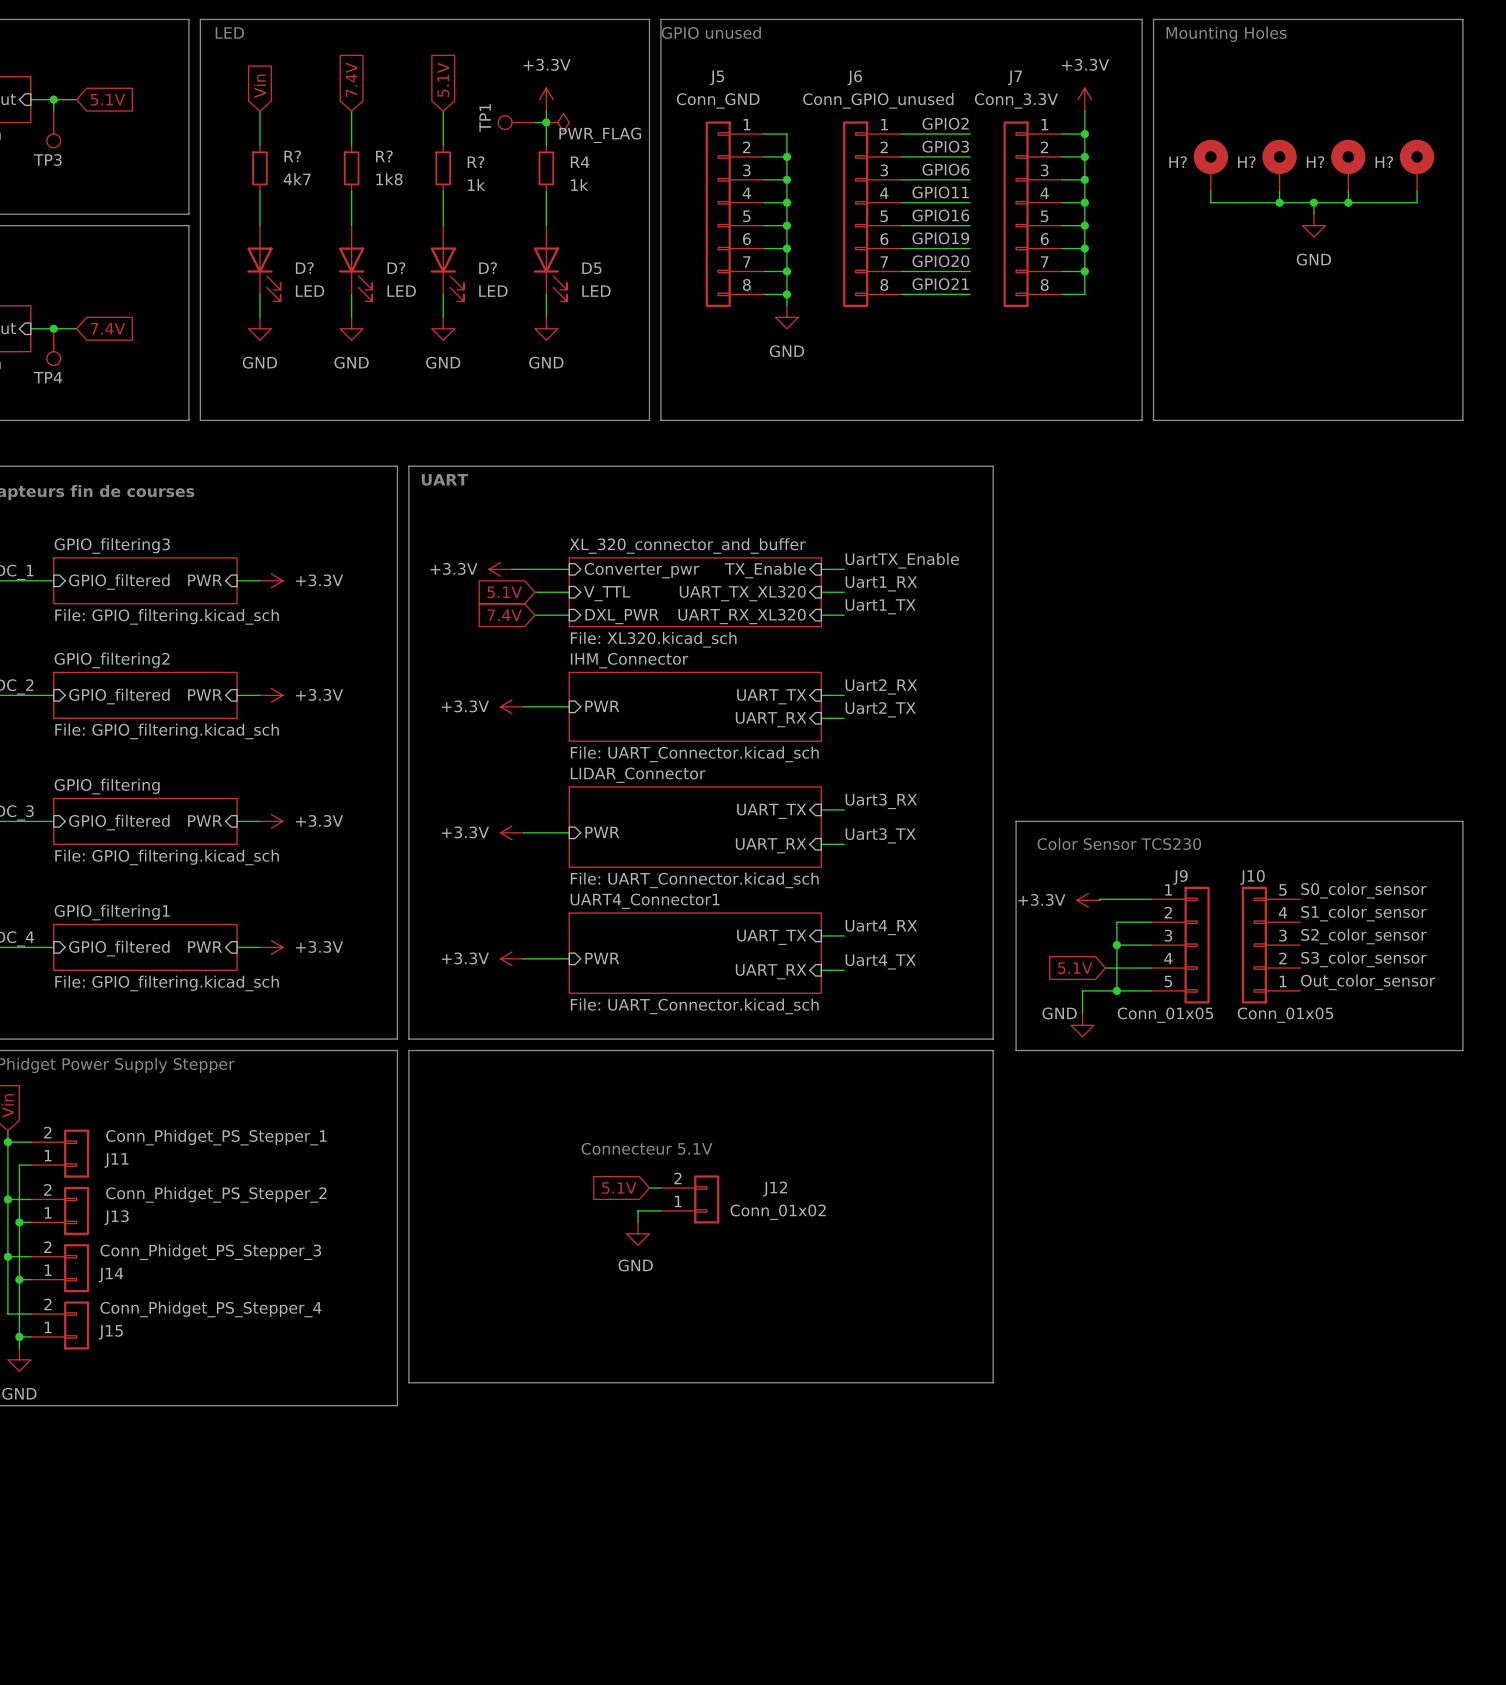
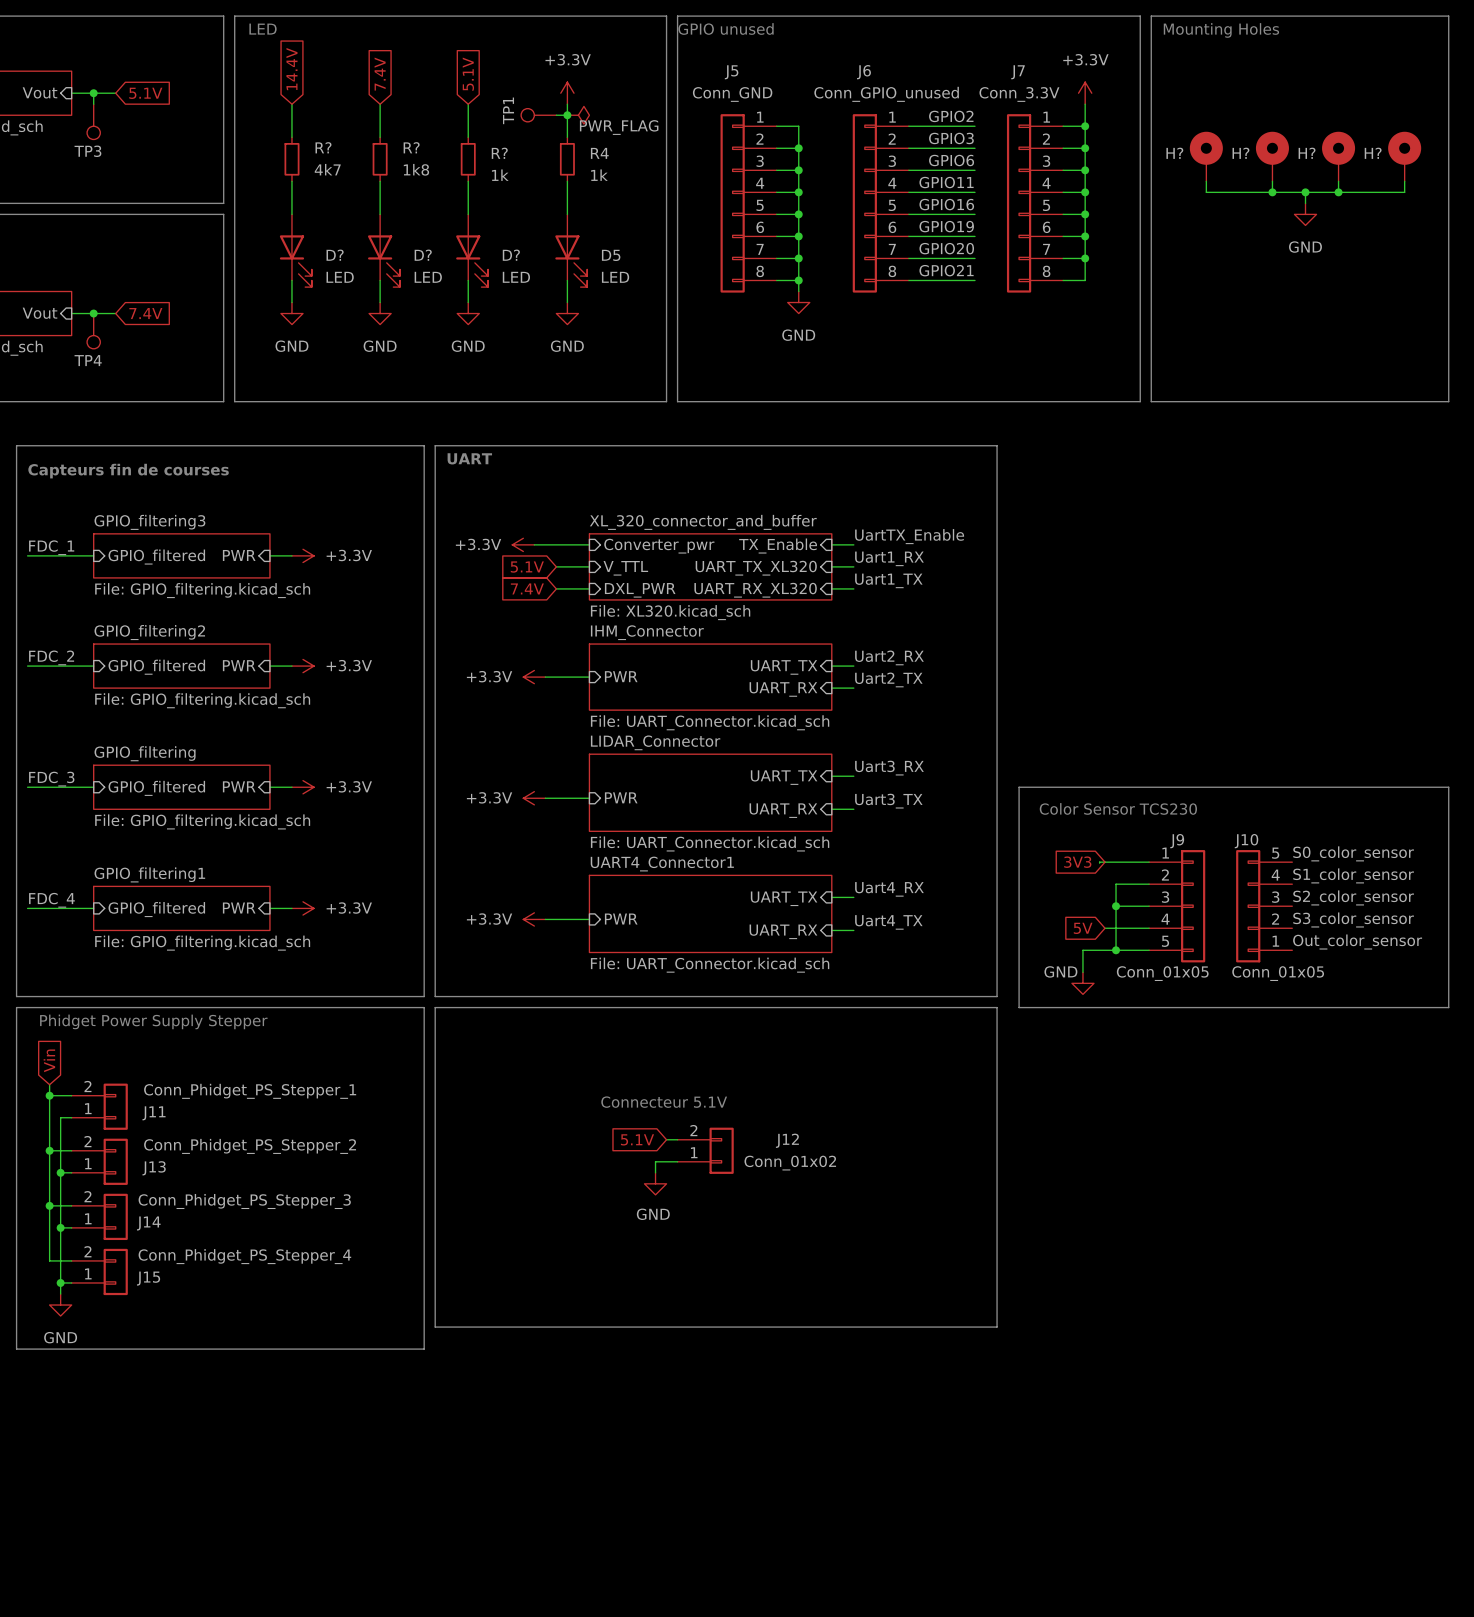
global label: Vin (259, 86) -> 14.4V (291, 69)
global label: none -> 3V3 (1077, 862)
power symbol: +3.3V (1088, 900) -> none
global label: 5.1V (1075, 968) -> 5V (1083, 928)

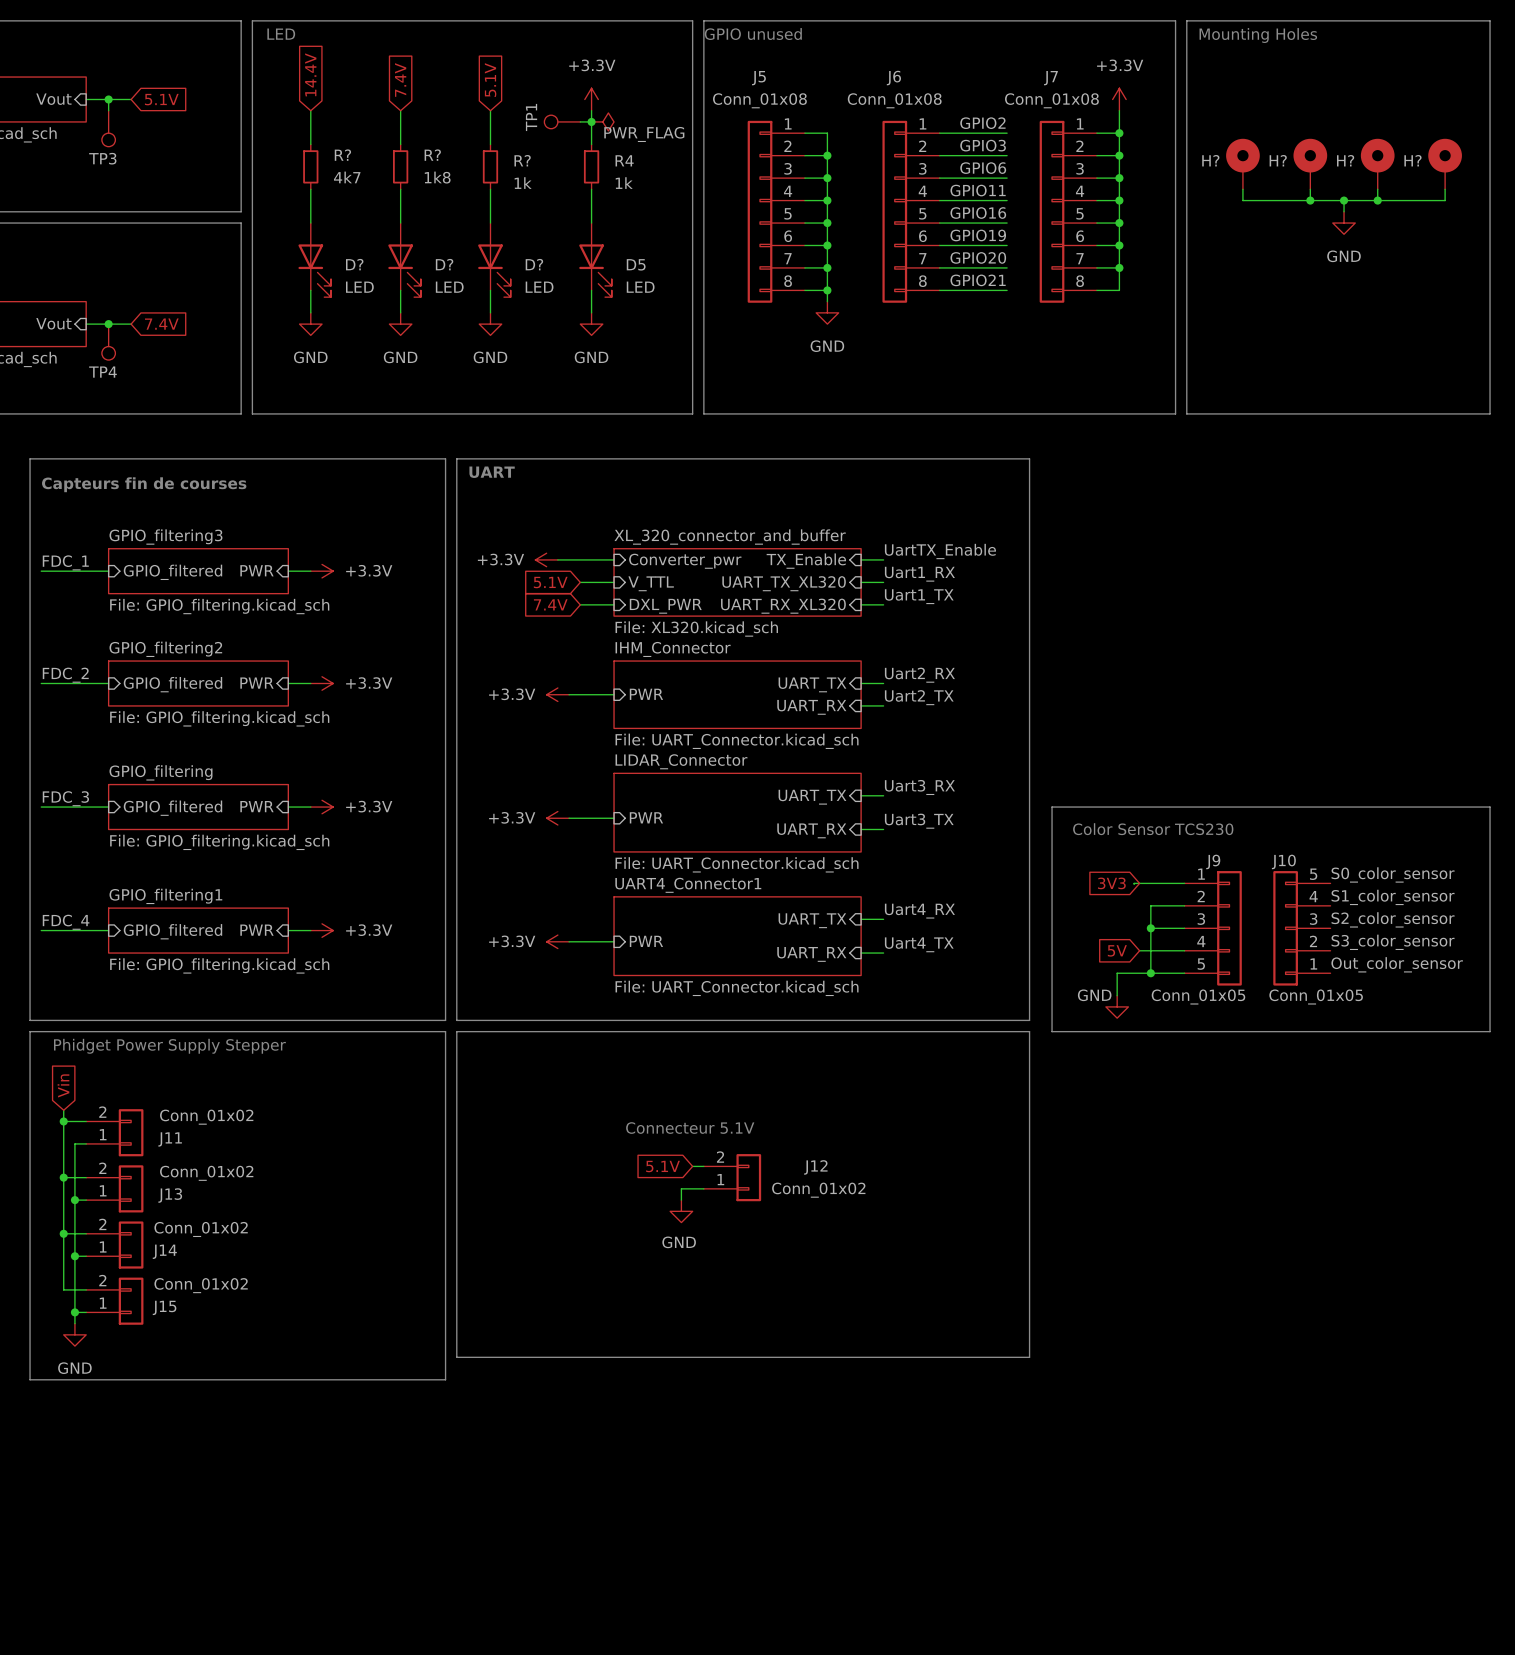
J5 value: Conn_GND (732, 94) -> Conn_01x08 (759, 100)
J6 value: Conn_GPIO_unused (886, 94) -> Conn_01x08 (894, 100)
J7 value: Conn_3.3V (1019, 94) -> Conn_01x08 (1051, 100)
J11 value: Conn_Phidget_PS_Stepper_1 (250, 1091) -> Conn_01x02 (206, 1117)
J13 value: Conn_Phidget_PS_Stepper_2 (250, 1146) -> Conn_01x02 (206, 1173)
J14 value: Conn_Phidget_PS_Stepper_3 (244, 1201) -> Conn_01x02 (201, 1229)
J15 value: Conn_Phidget_PS_Stepper_4 (244, 1256) -> Conn_01x02 (201, 1285)

